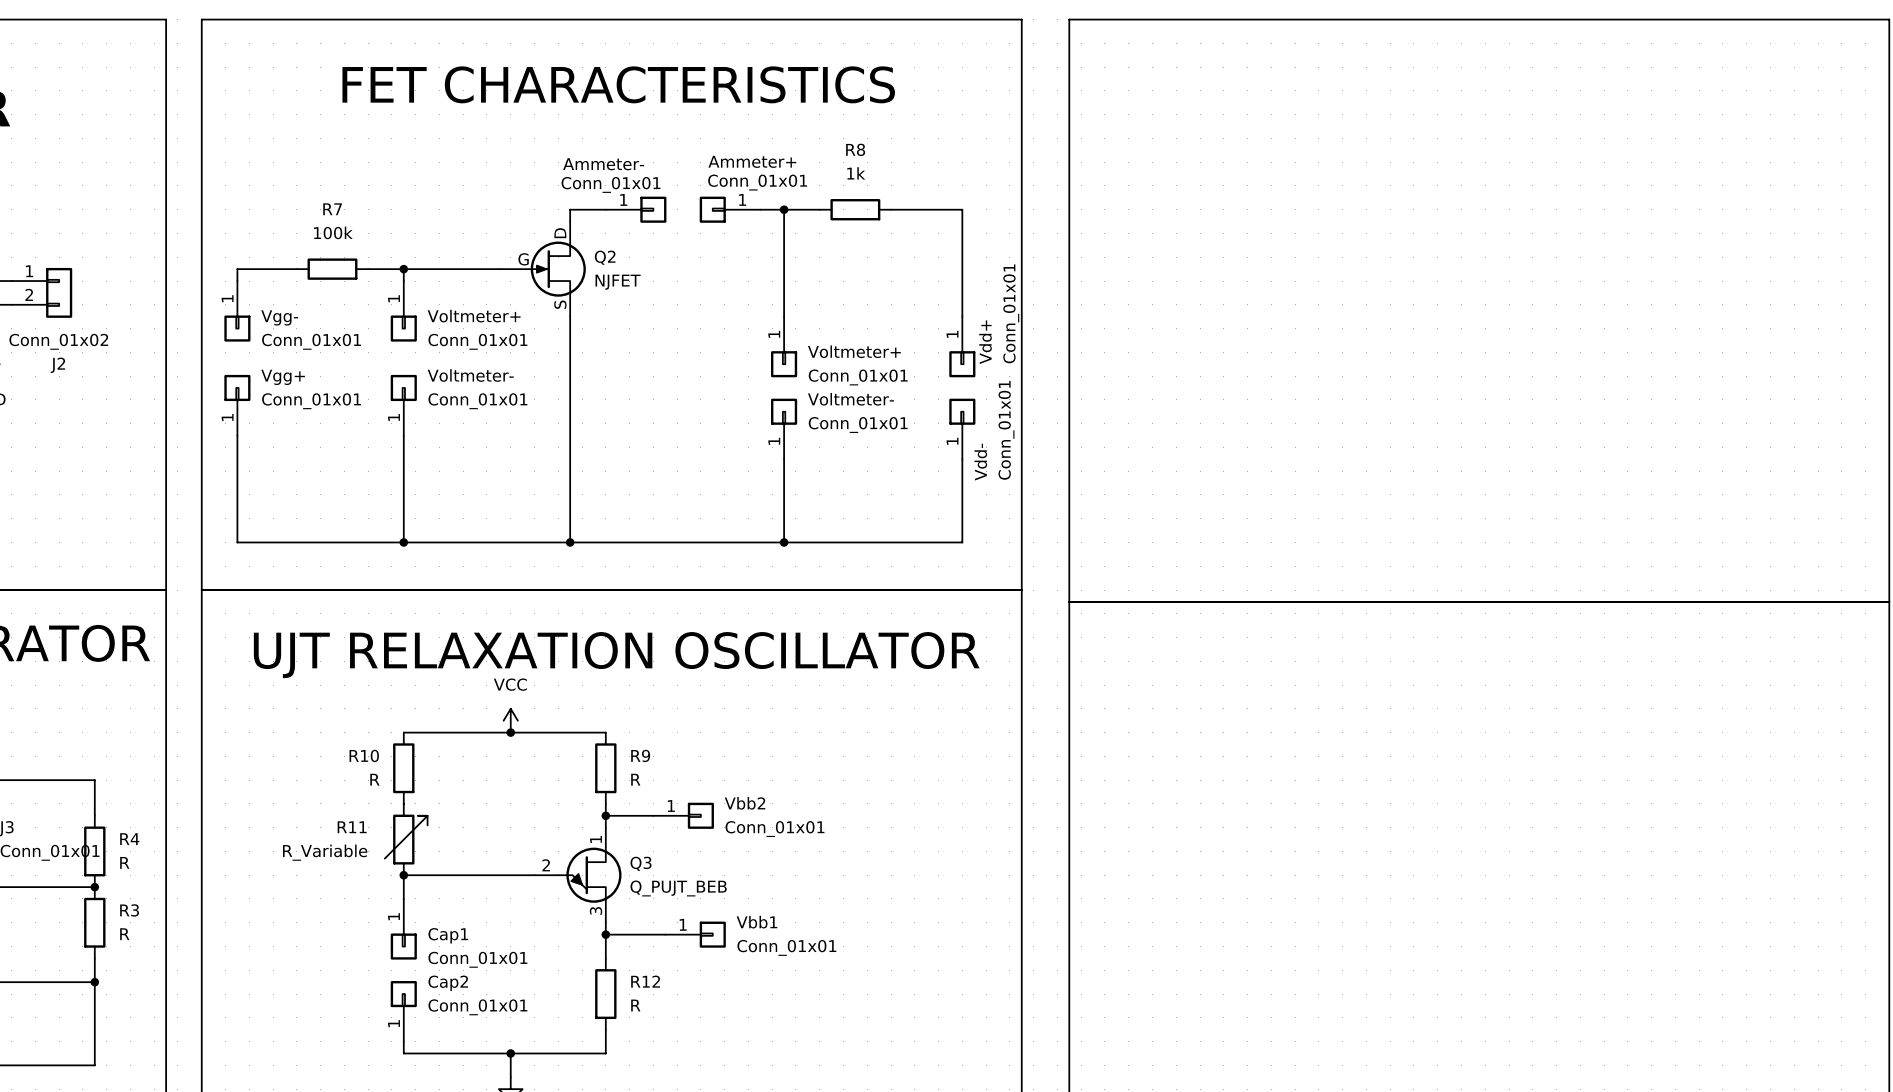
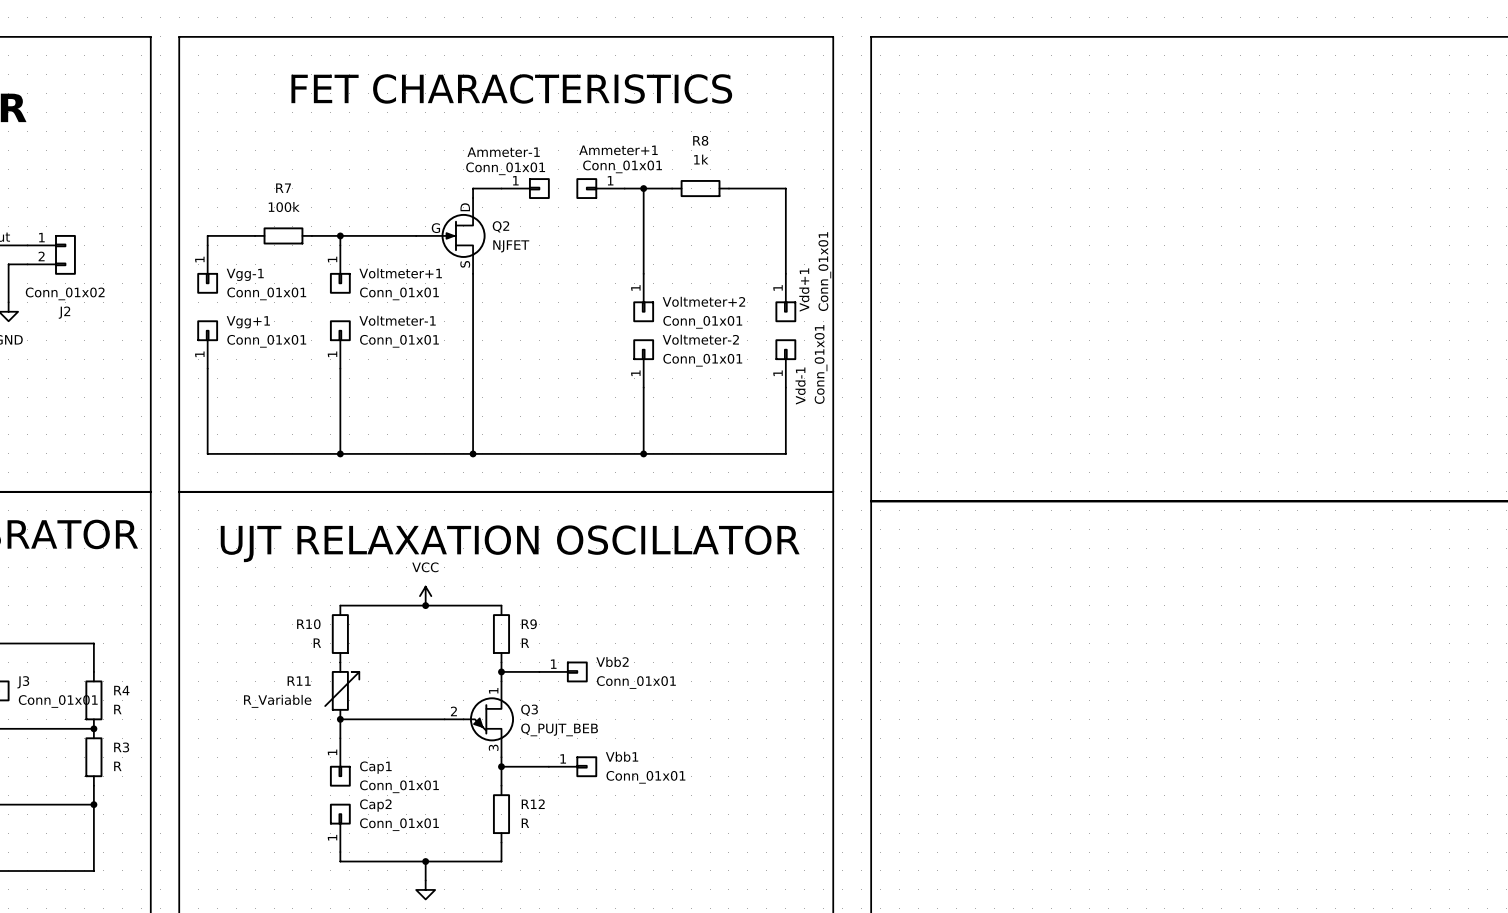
Ammeter+ name: Ammeter+ (752, 161) -> Ammeter+1 (618, 150)
Ammeter- name: Ammeter- (603, 164) -> Ammeter-1 (503, 152)
Voltmeter+ name: Voltmeter+ (474, 316) -> Voltmeter+1 (400, 273)
Vgg- name: Vgg- (279, 317) -> Vgg-1 (245, 274)
Vdd+ name: Vdd+ (985, 342) -> Vdd+1 (804, 290)
Voltmeter+ name: Voltmeter+ (854, 351) -> Voltmeter+2 (703, 301)
Voltmeter- name: Voltmeter- (470, 375) -> Voltmeter-1 (397, 320)
Vgg+ name: Vgg+ (283, 377) -> Vgg+1 (248, 322)
Voltmeter- name: Voltmeter- (850, 399) -> Voltmeter-2 (700, 339)
Vdd- name: Vdd- (980, 462) -> Vdd-1 (800, 386)

